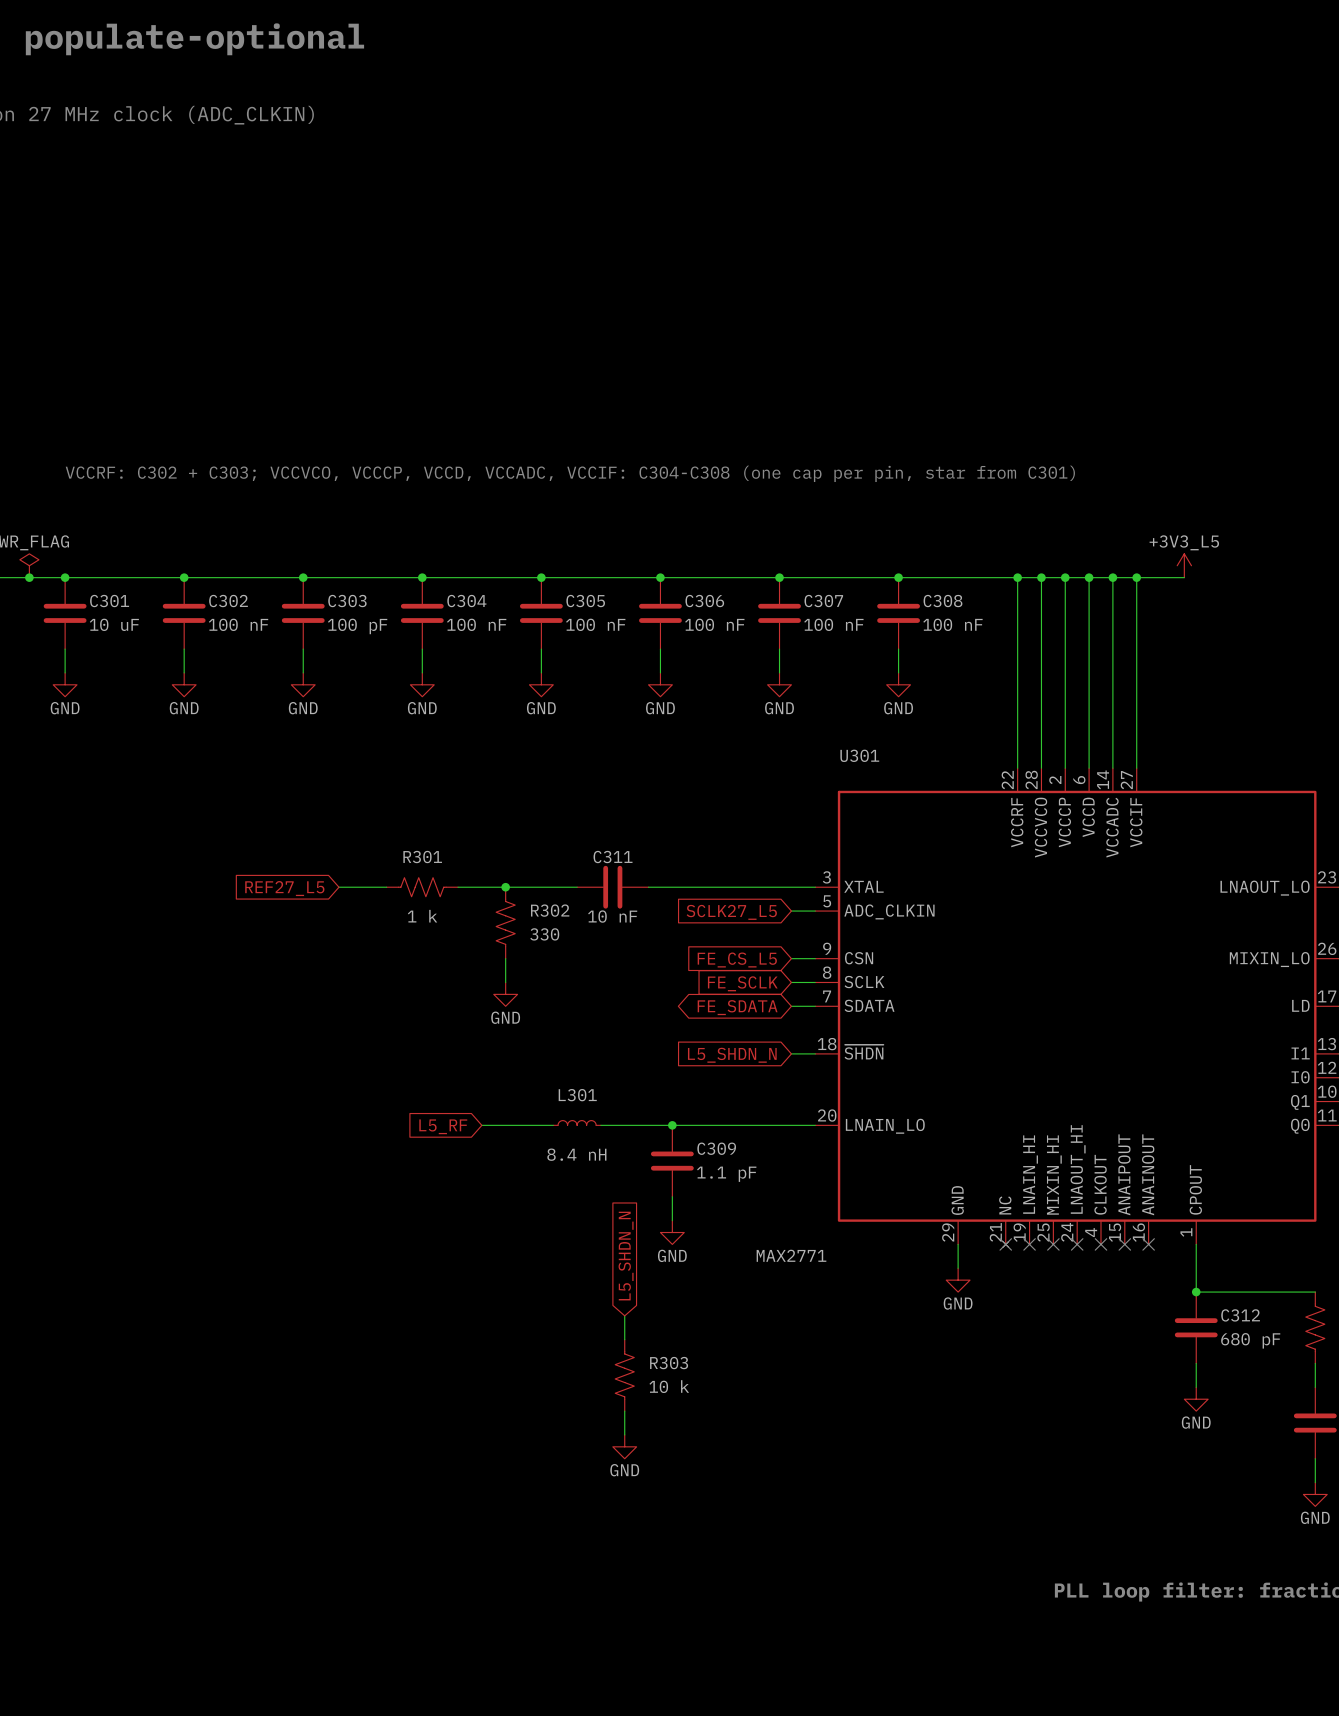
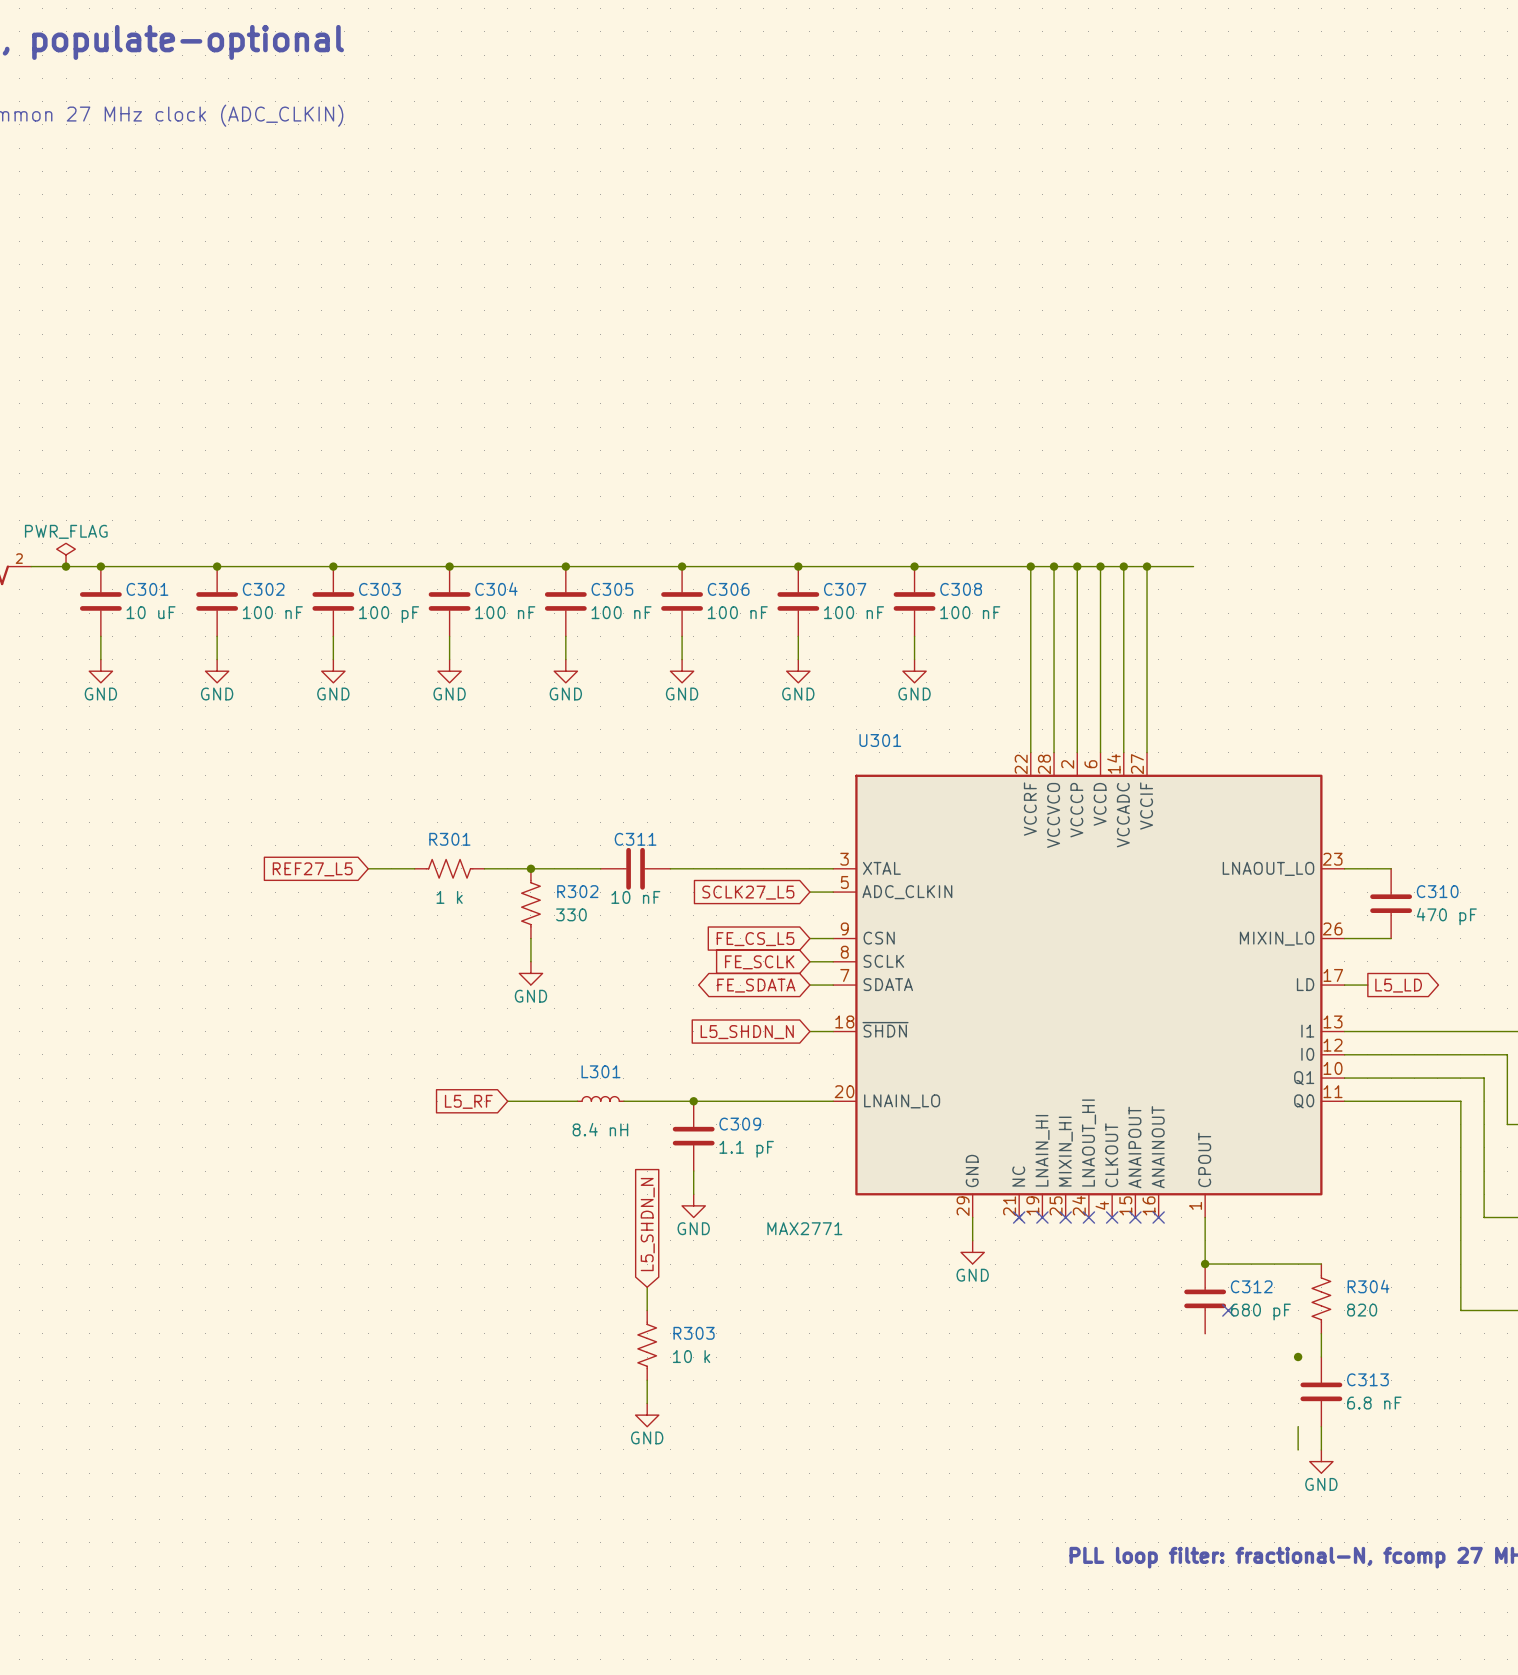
text: VCCRF: C302 + C303; VCCVCO, VCCCP, VCCD, VCCADC, VCCIF: C304-C308 (one cap per pin, star from C301) (570, 473) -> none
power symbol: +3V3_L5 (1184, 565) -> none
no-connect mark: none -> (1228, 1310)
wire: (1196, 1363) (1196, 1387) -> (1298, 1426) (1298, 1449)
junction: none -> (1298, 1357)
power symbol: GND (1196, 1399) -> none

